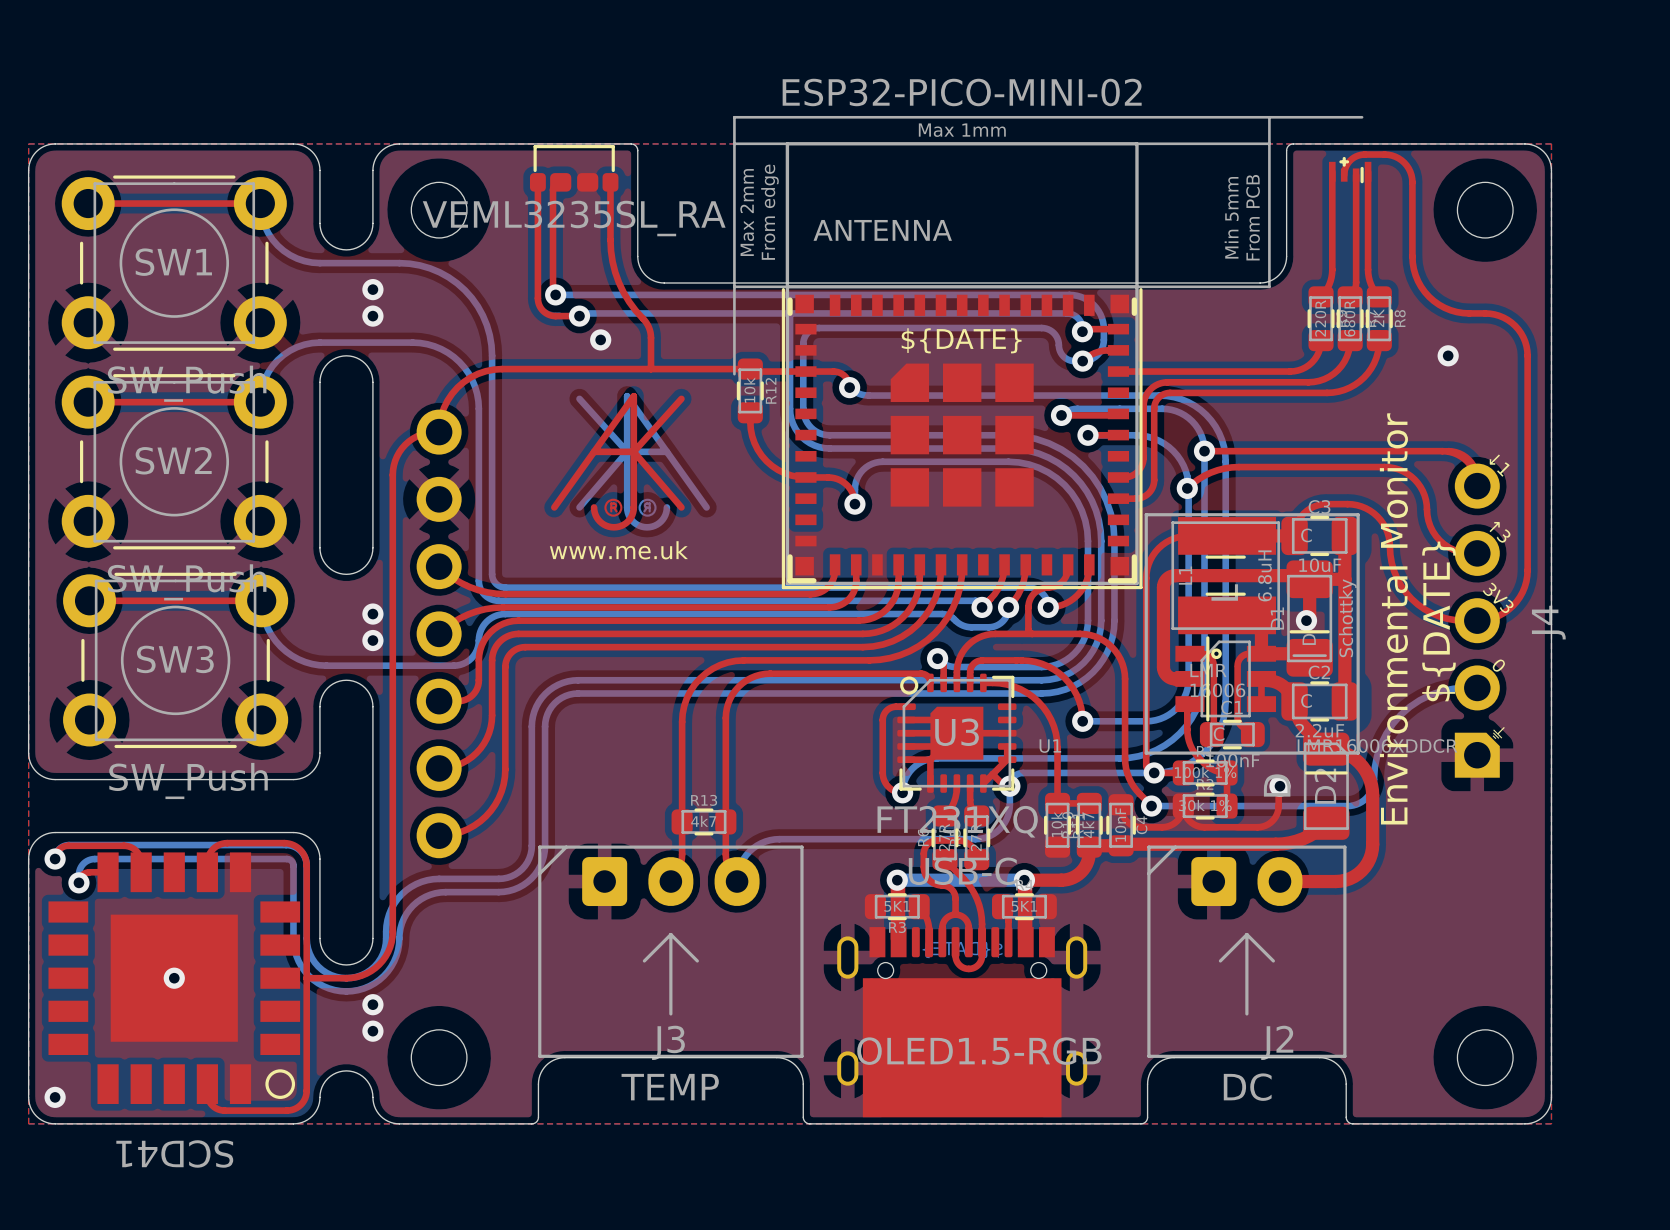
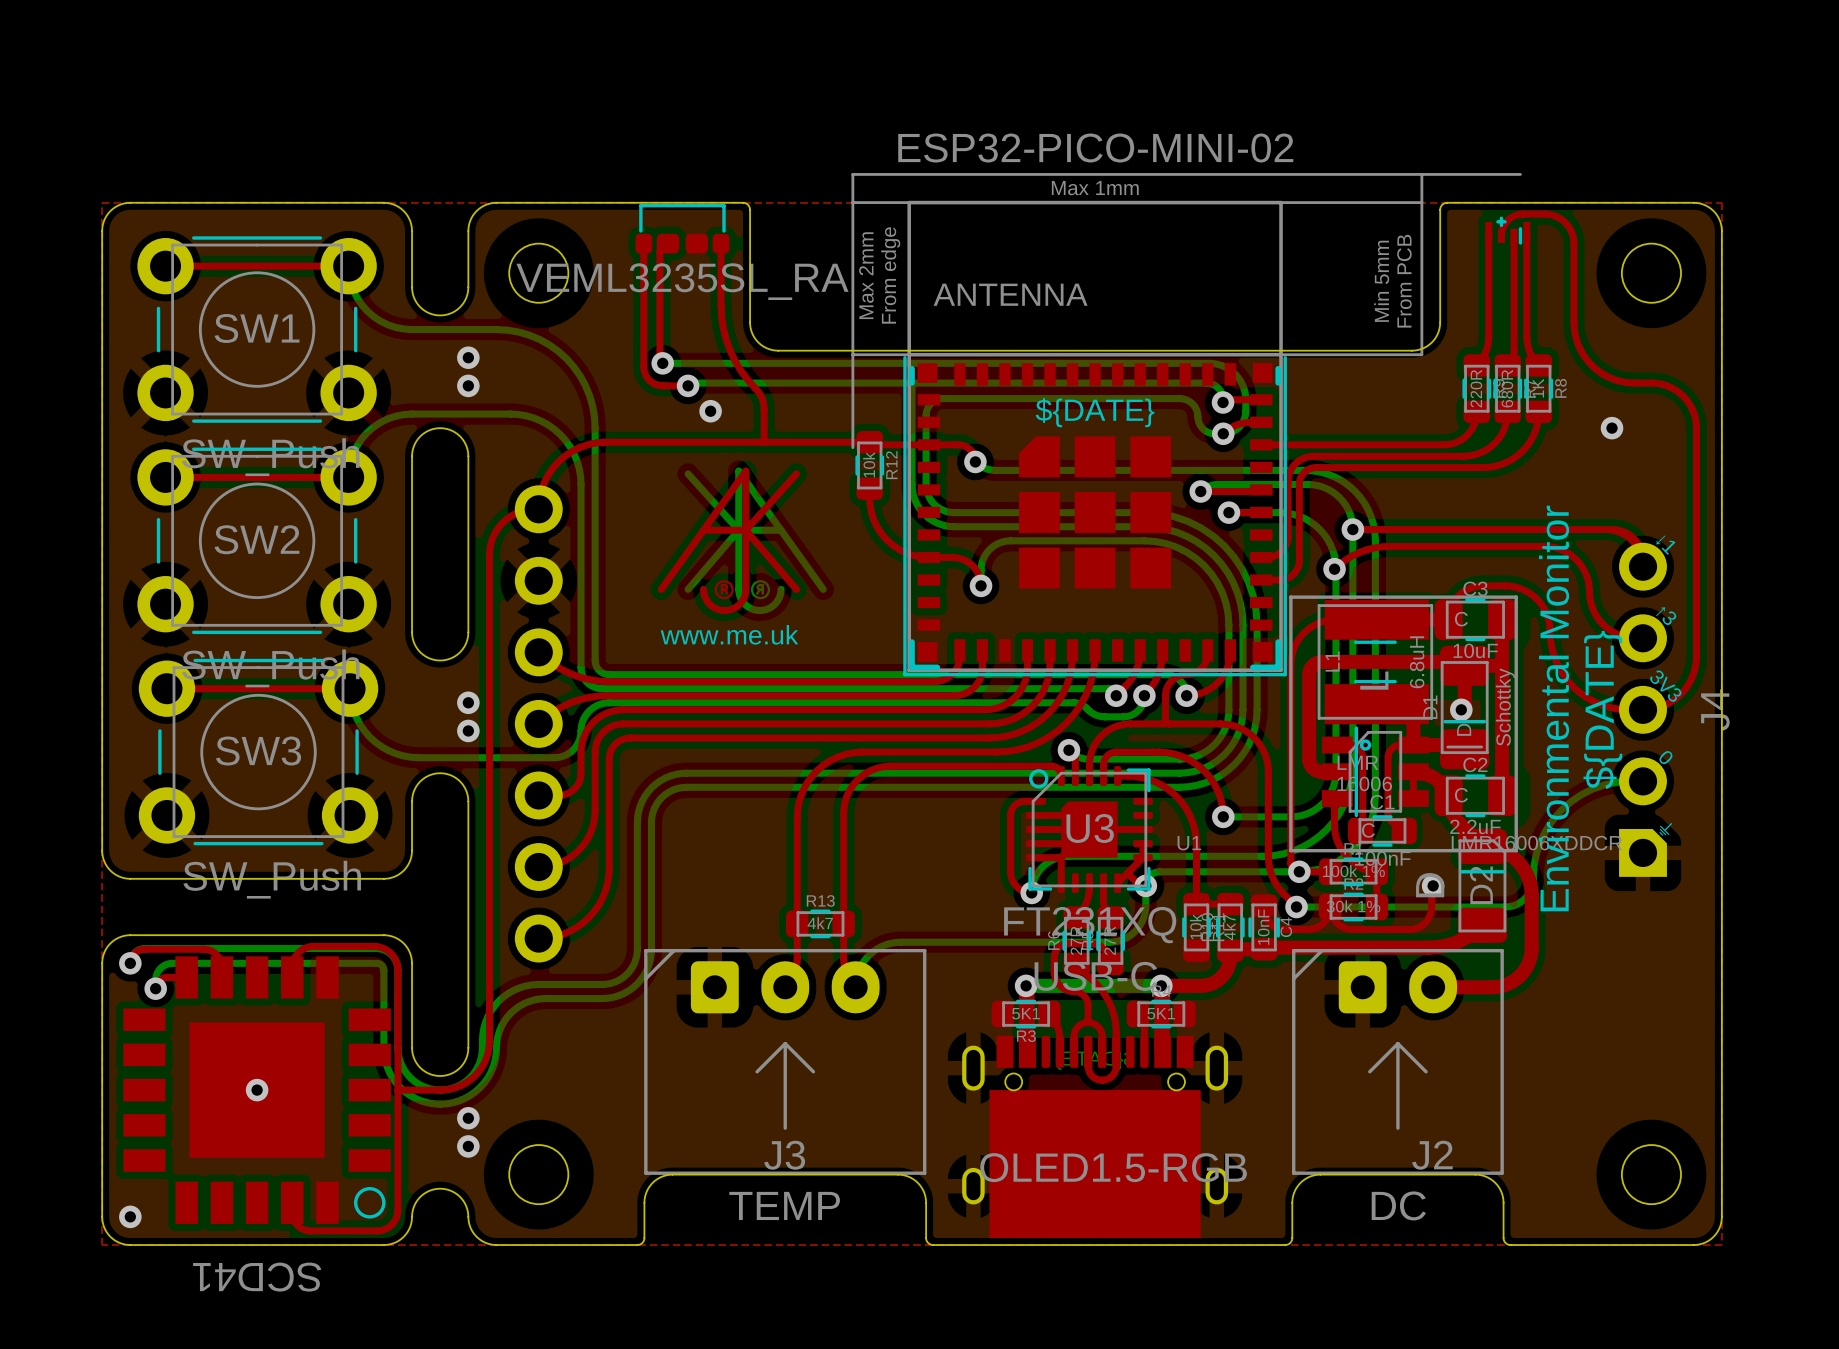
R8 value: 2K (1378, 318) -> 1K (1538, 388)

